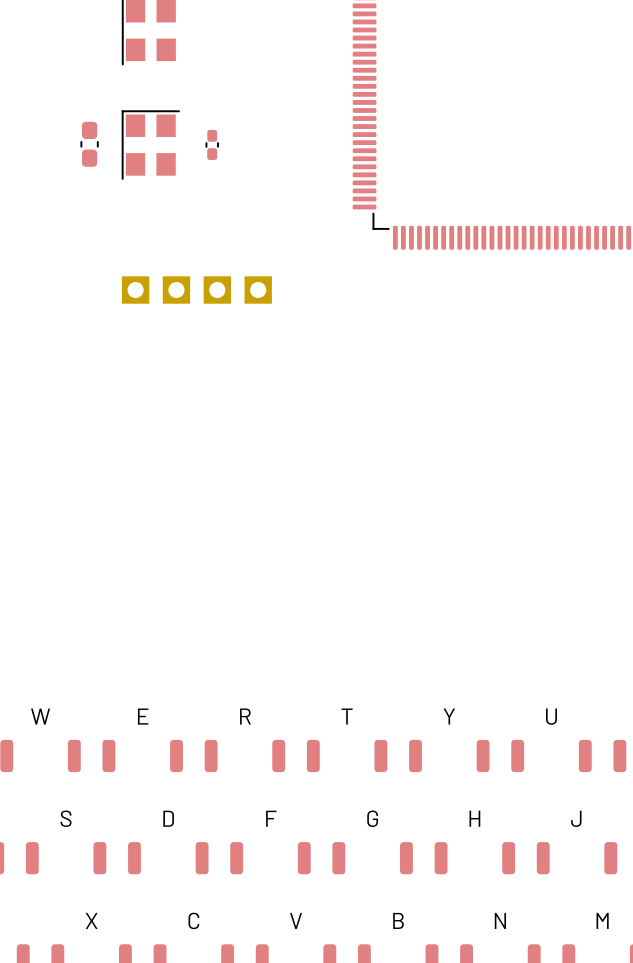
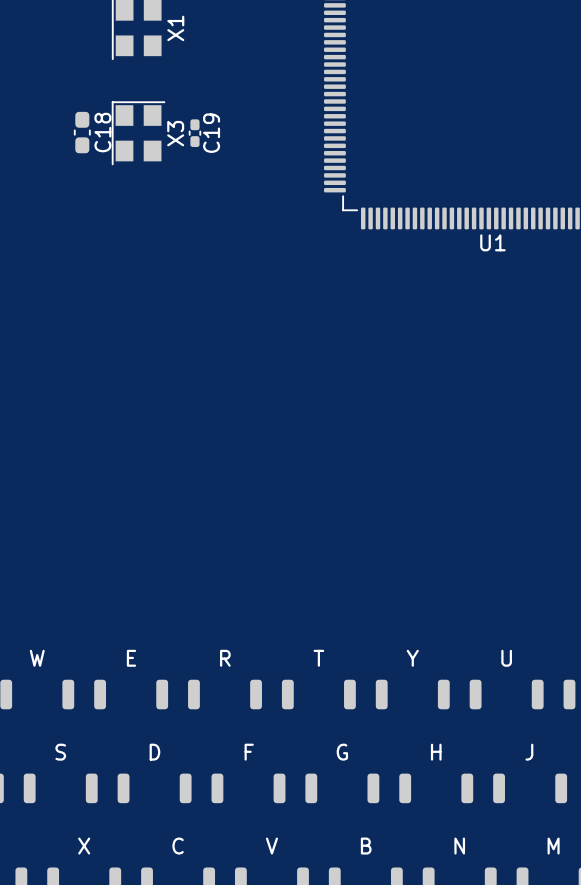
X1 name: none -> X1 (175, 28)
C18 name: none -> C18 (102, 132)
C19 name: none -> C19 (211, 133)
X3 name: none -> X3 (175, 133)
U1 name: none -> U1 (492, 242)
part: (135, 290) -> none
part: (176, 290) -> none
part: (217, 290) -> none
part: (258, 290) -> none

